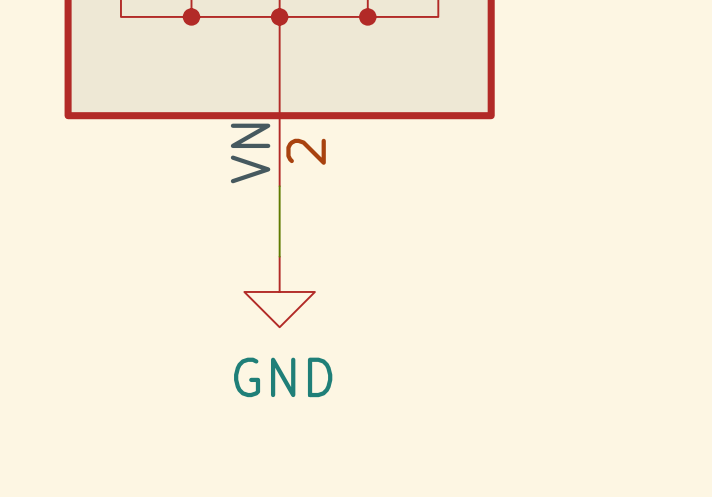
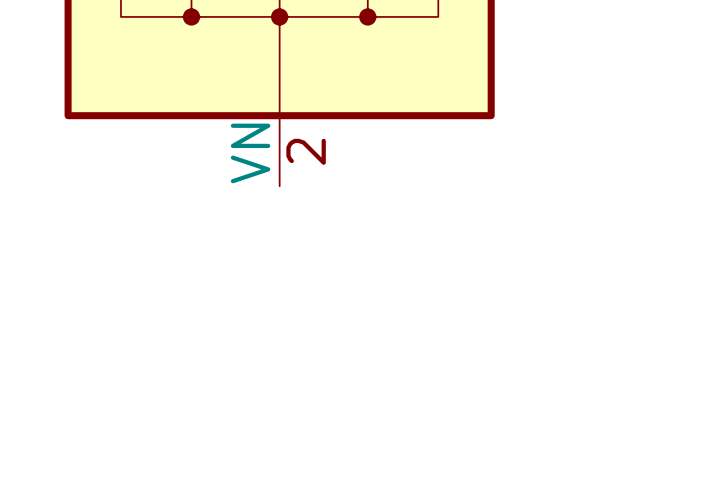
wire: (279, 186) (279, 256) -> none
power symbol: GND (279, 291) -> none

